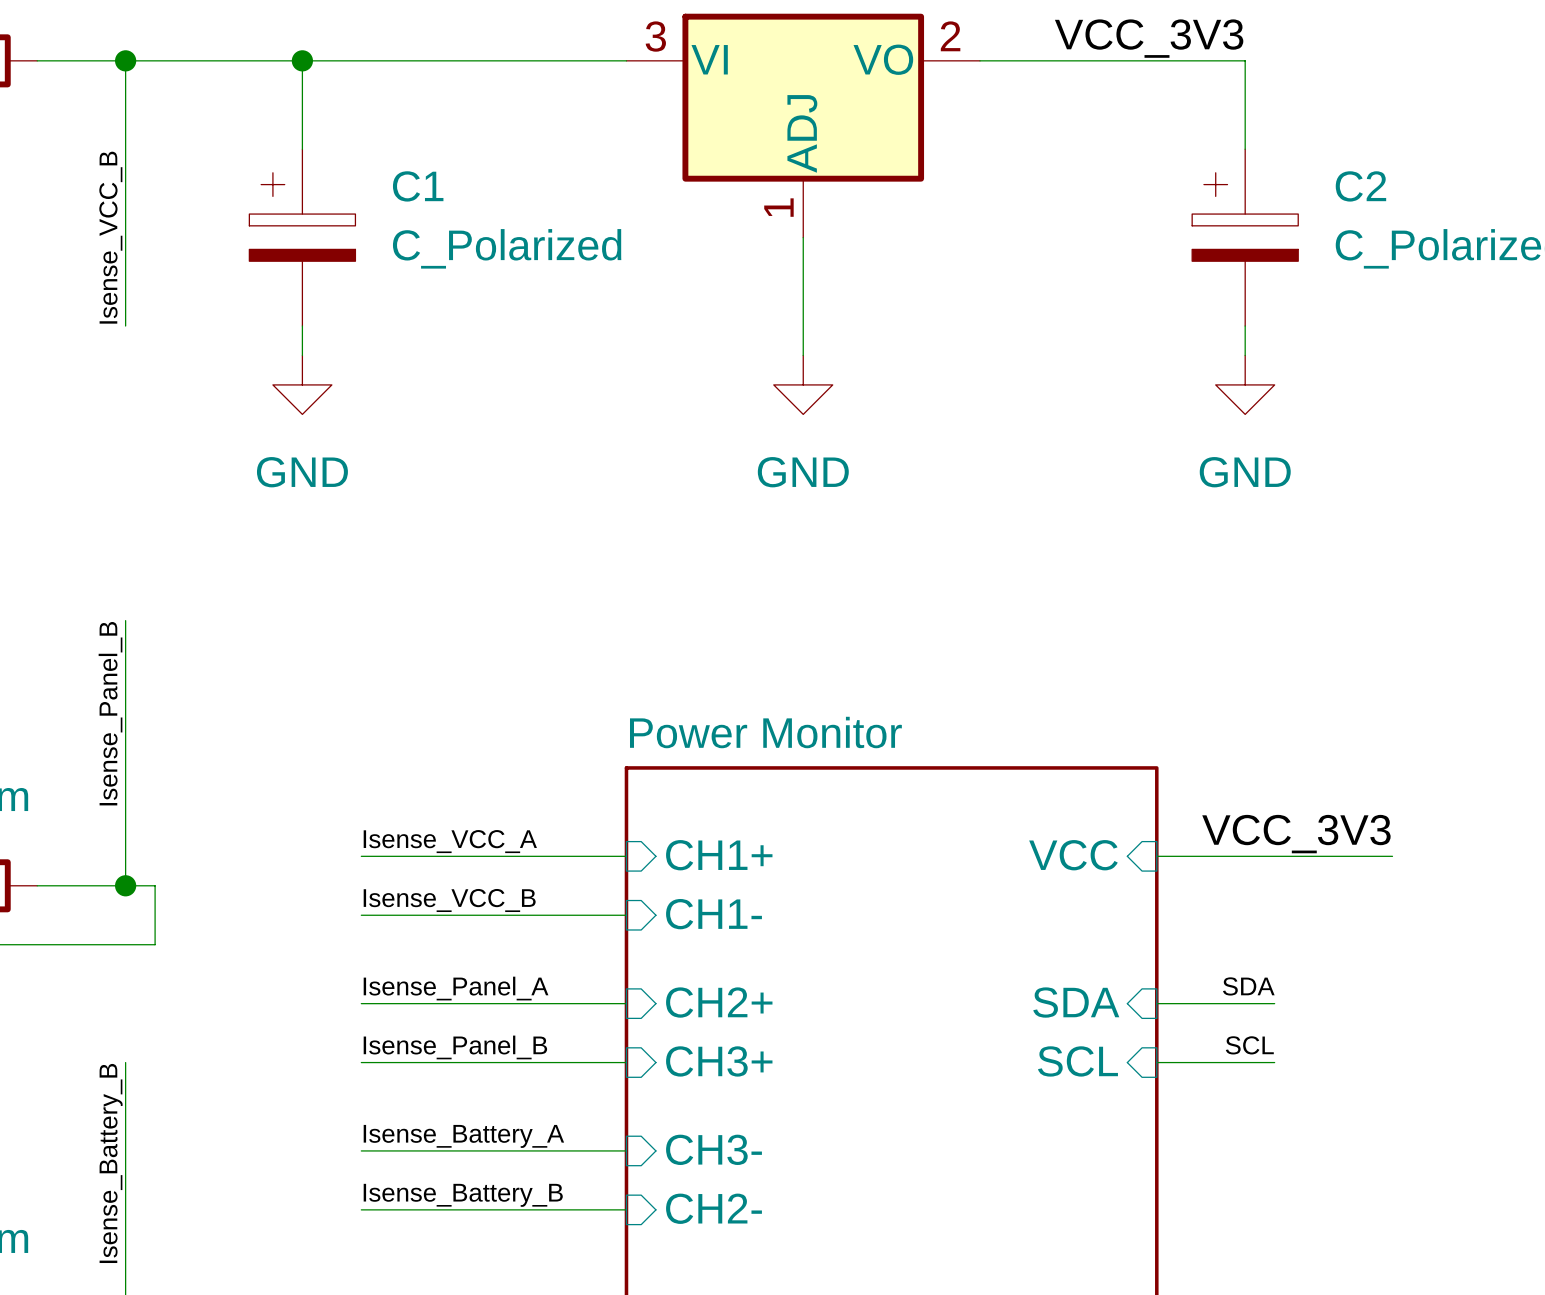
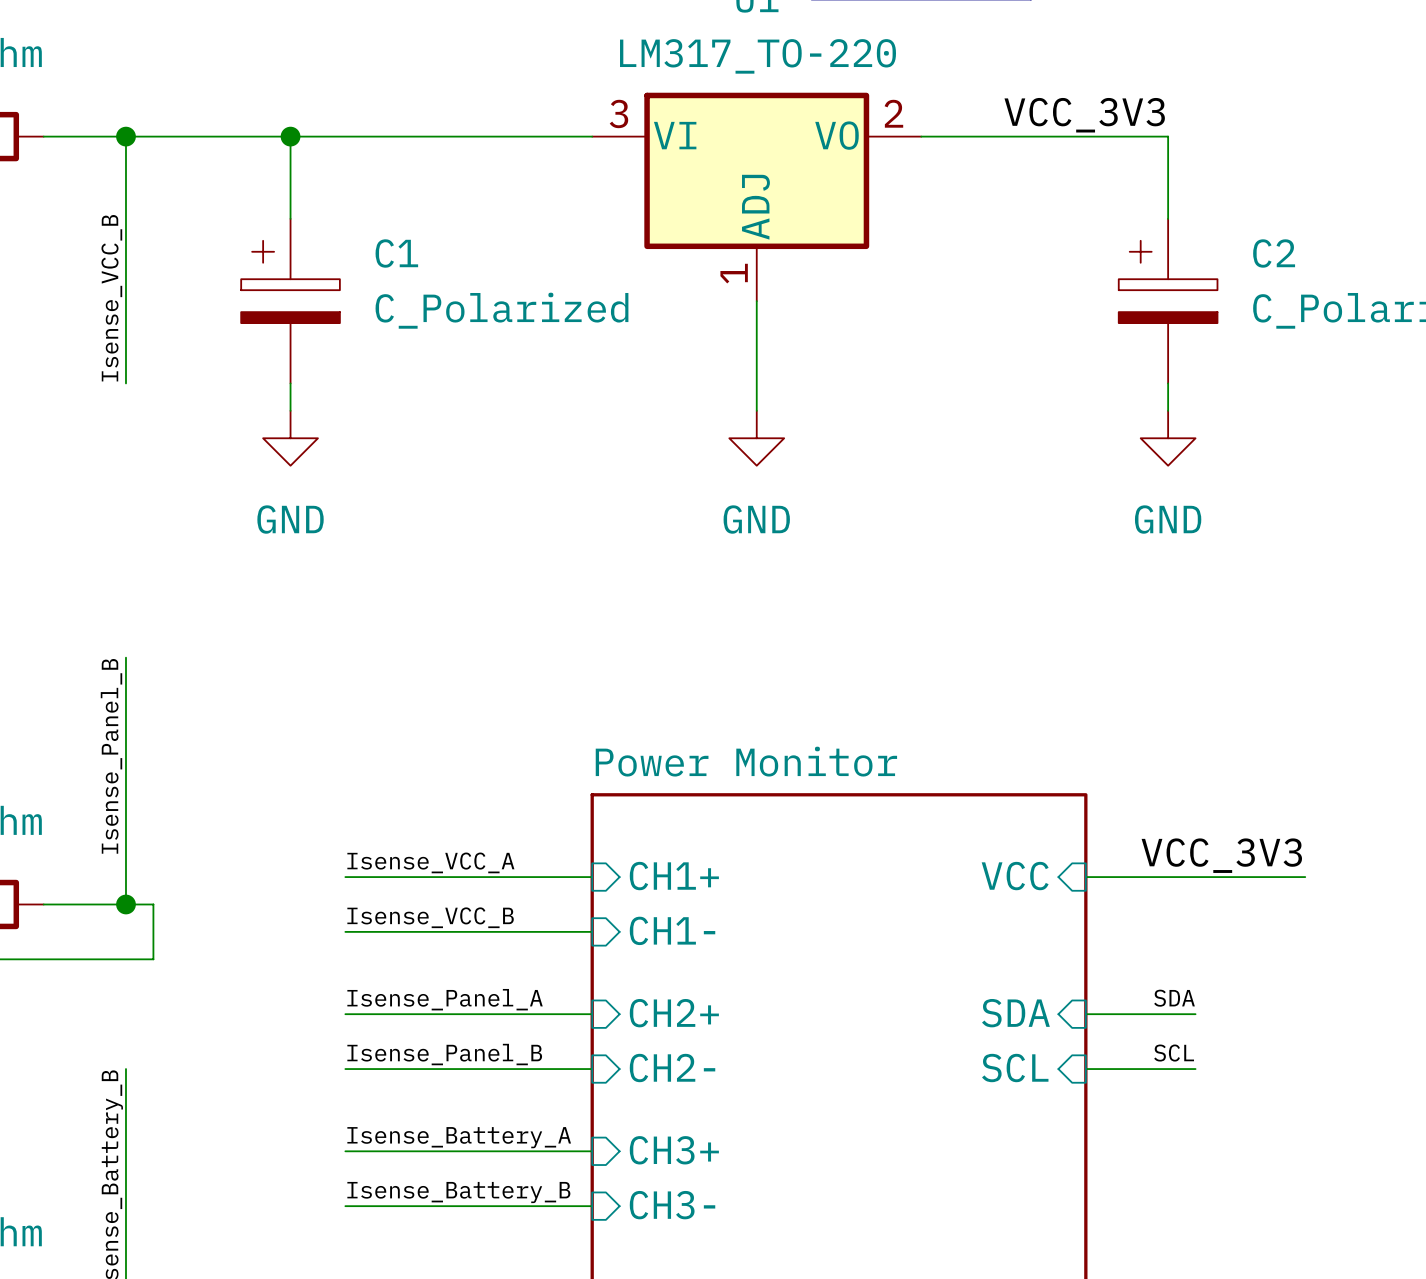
sheet pin: CH3+ (719, 1061) -> CH2- (672, 1068)
sheet pin: CH3- (714, 1149) -> CH3+ (674, 1150)
sheet pin: CH2- (714, 1208) -> CH3- (672, 1205)

